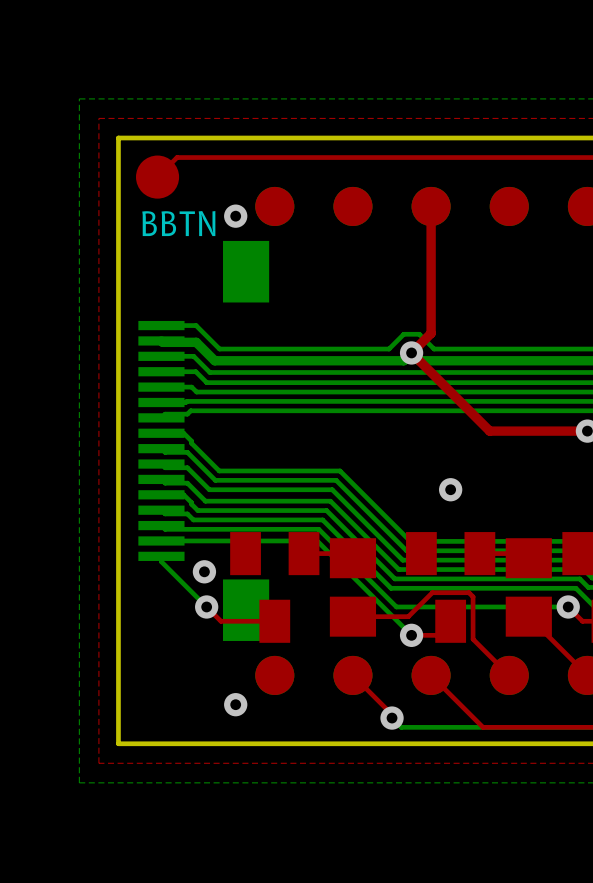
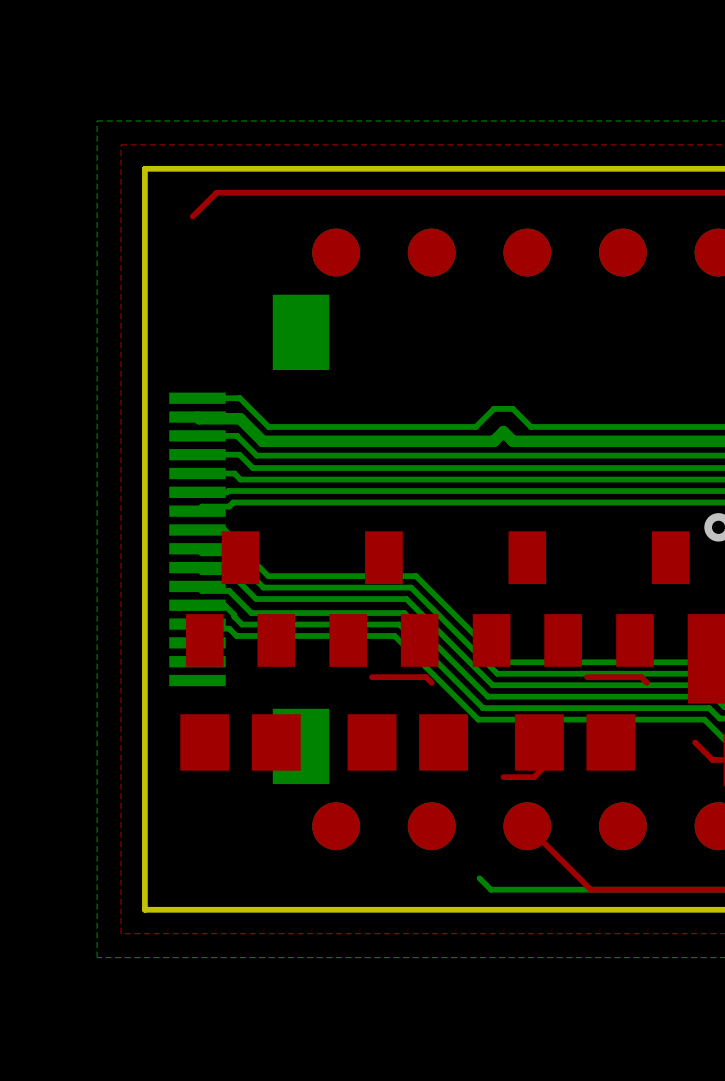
BBTN: (157, 177) -> none
top track: (431, 206) (431, 333) (411, 352) (489, 431) (587, 431) -> none
via: (235, 216) -> none
via: (411, 352) -> none
part: none -> (240, 599)
part: none -> (383, 599)
part: none -> (527, 599)
via: (450, 489) -> none
part: none -> (670, 599)
bottom track: (161, 525) (165, 529) (318, 529) (396, 606) (568, 606) -> none
part footprint: [406, 532, 496, 643] -> [514, 714, 636, 771]
bottom track: (161, 540) (317, 540) (411, 635) -> none
bottom track: (161, 556) (161, 561) (206, 606) -> none
via: (204, 571) -> none
part: (274, 587) -> none
part rotation: 0° (352, 587) -> 90° clockwise (407, 742)
part: (528, 587) -> none
part: none -> (240, 742)
top track: (206, 606) (220, 621) (274, 621) -> none
via: (206, 606) -> none
via: (568, 606) -> none
top track: (352, 616) (408, 616) (432, 592) (468, 592) (473, 596) (473, 639) (509, 675) -> none
top track: (528, 616) (587, 675) -> none
via: (411, 635) -> none
top track: (352, 675) (392, 714) (392, 718) -> none
via: (235, 704) -> none
via: (392, 718) -> none

